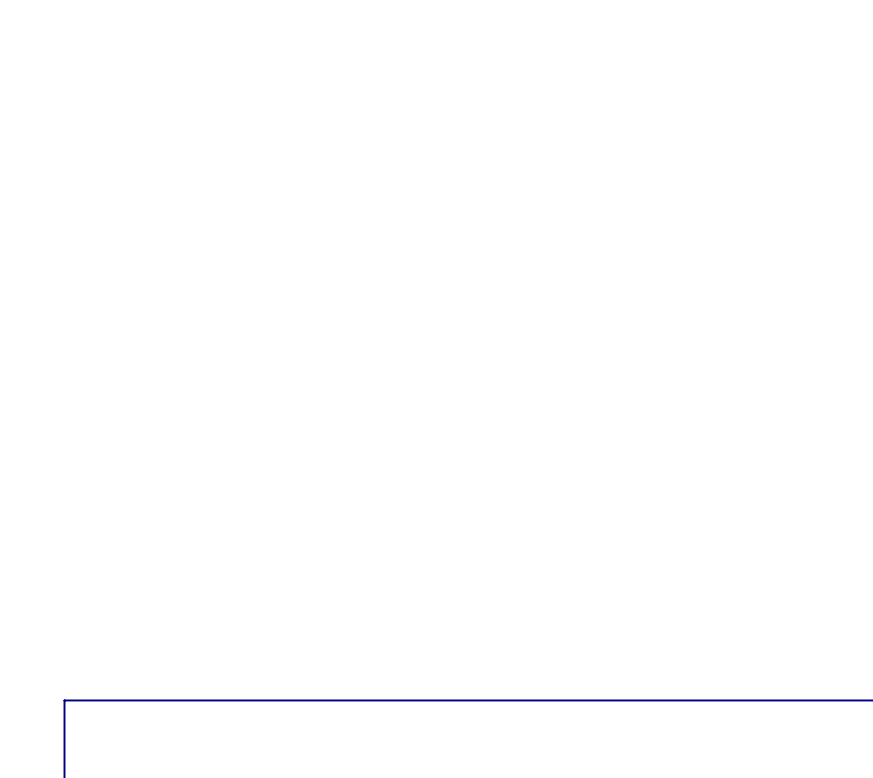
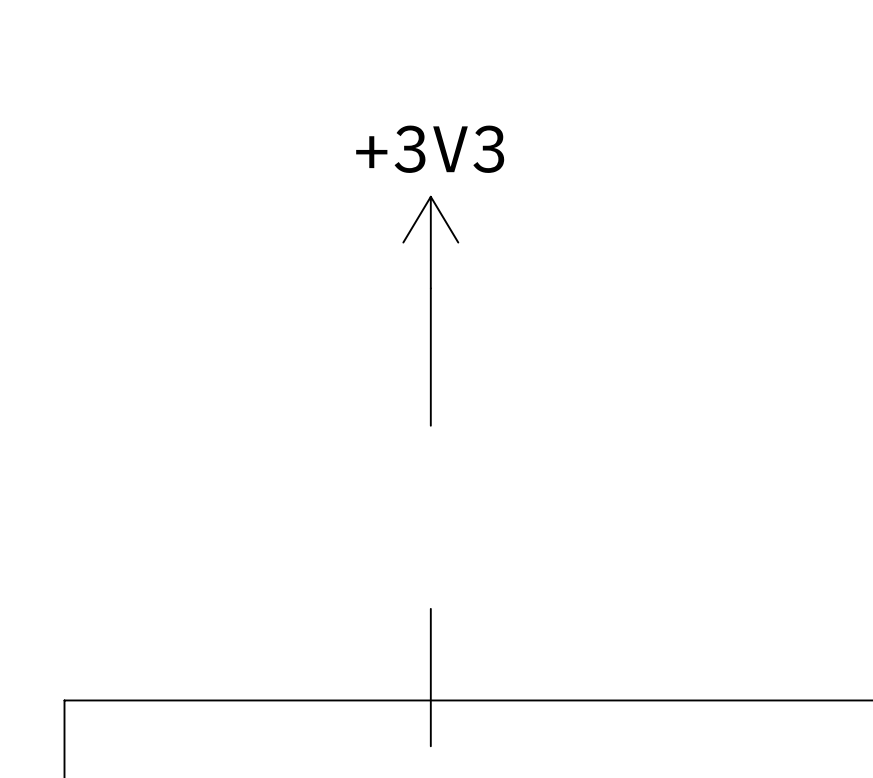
power symbol: none -> +3V3 (430, 242)
wire: none -> (430, 288) (430, 425)
wire: none -> (430, 608) (430, 746)

